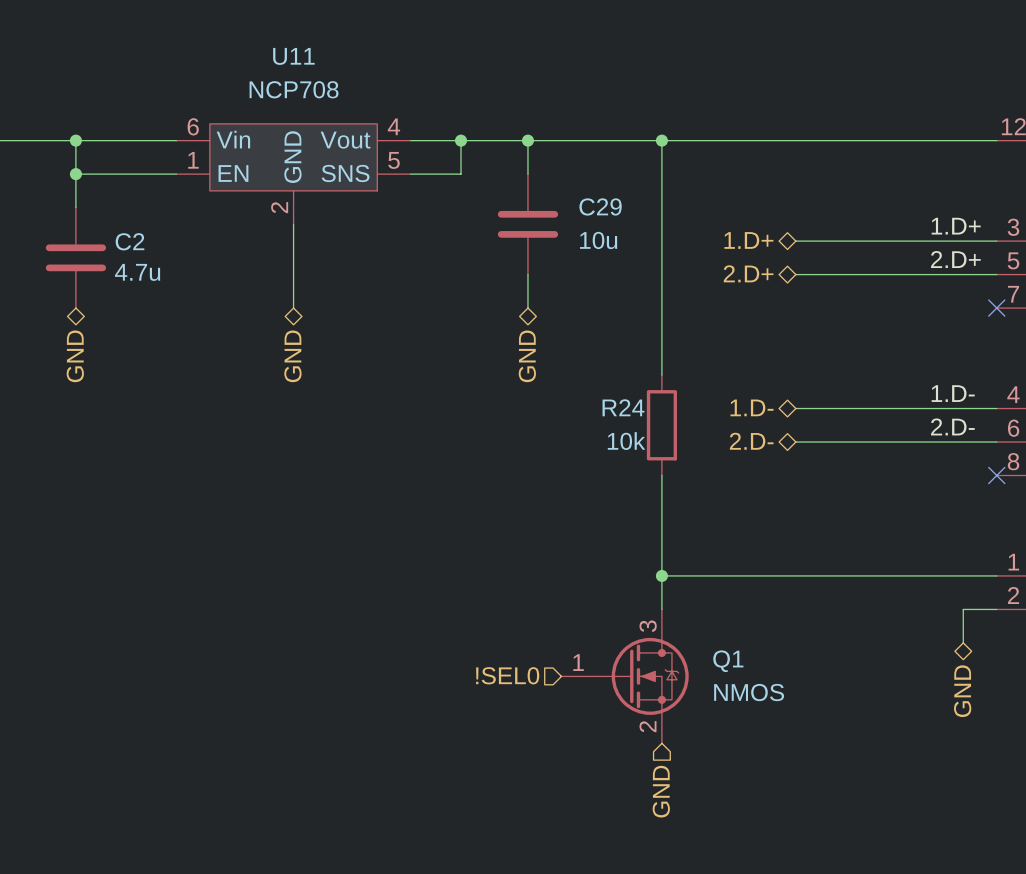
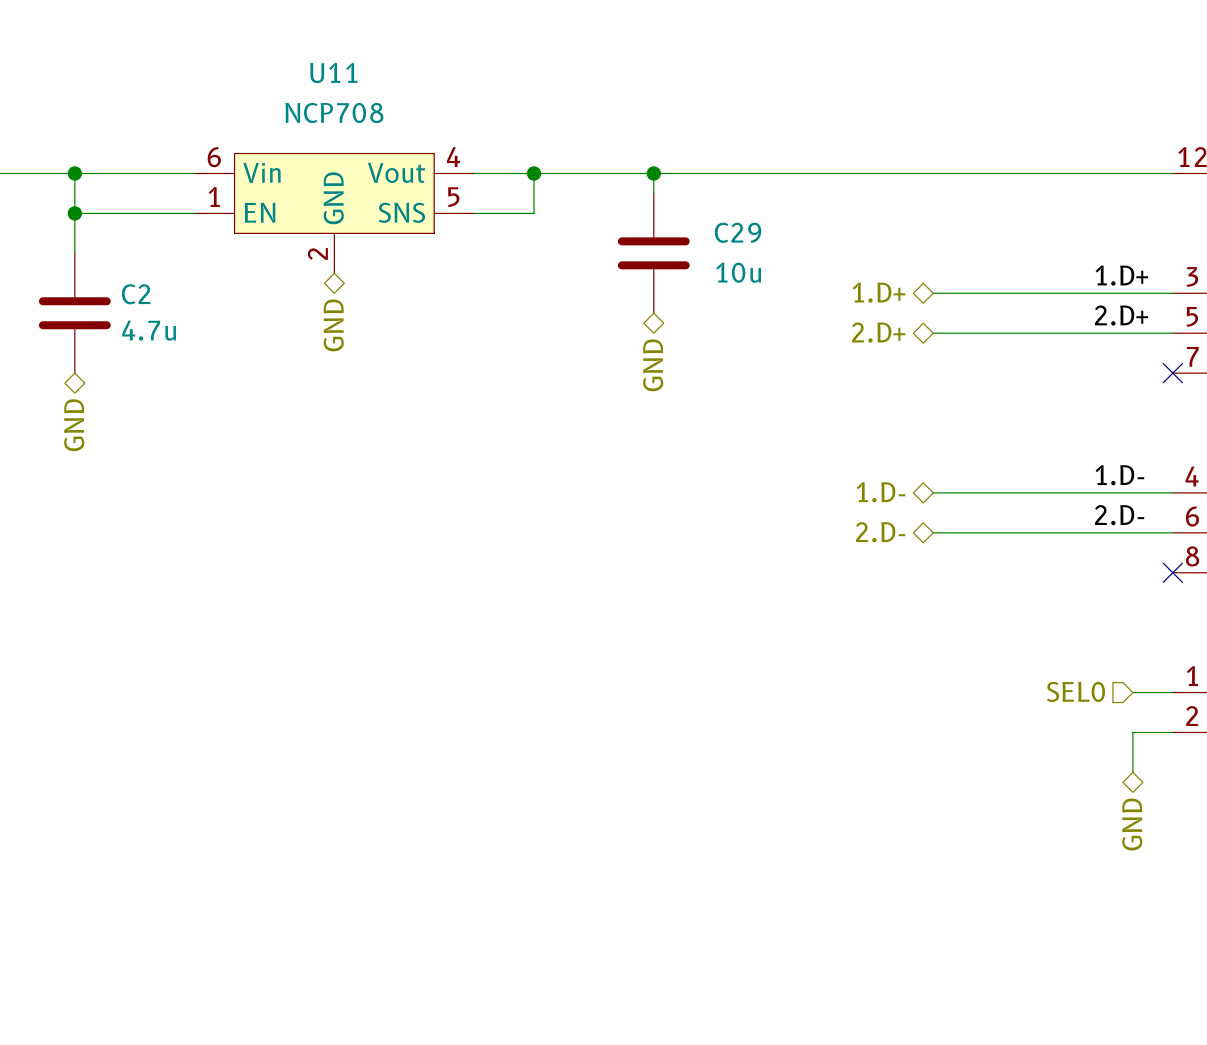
wire: (527, 140) (527, 174) -> none
junction position: (527, 140) -> (653, 173)
wire: none -> (653, 173) (653, 193)
wire: (661, 140) (661, 375) -> none
junction: (661, 140) -> none
wire: (293, 224) (293, 308) -> none
C29 position: (527, 224) -> (653, 253)
wire: (527, 274) (527, 308) -> none
hierarchical label position: GND (292, 356) -> GND (333, 325)
hierarchical label position: GND (527, 356) -> GND (653, 365)
R24: 10k (661, 425) -> none
wire: (661, 475) (661, 609) -> none
wire: (661, 575) (963, 575) -> none
junction: (661, 575) -> none
hierarchical label: none -> SEL0 (1075, 691)
hierarchical label: !SEL0 (507, 675) -> none
Q1: NMOS (625, 676) -> none
hierarchical label: GND (661, 791) -> none

